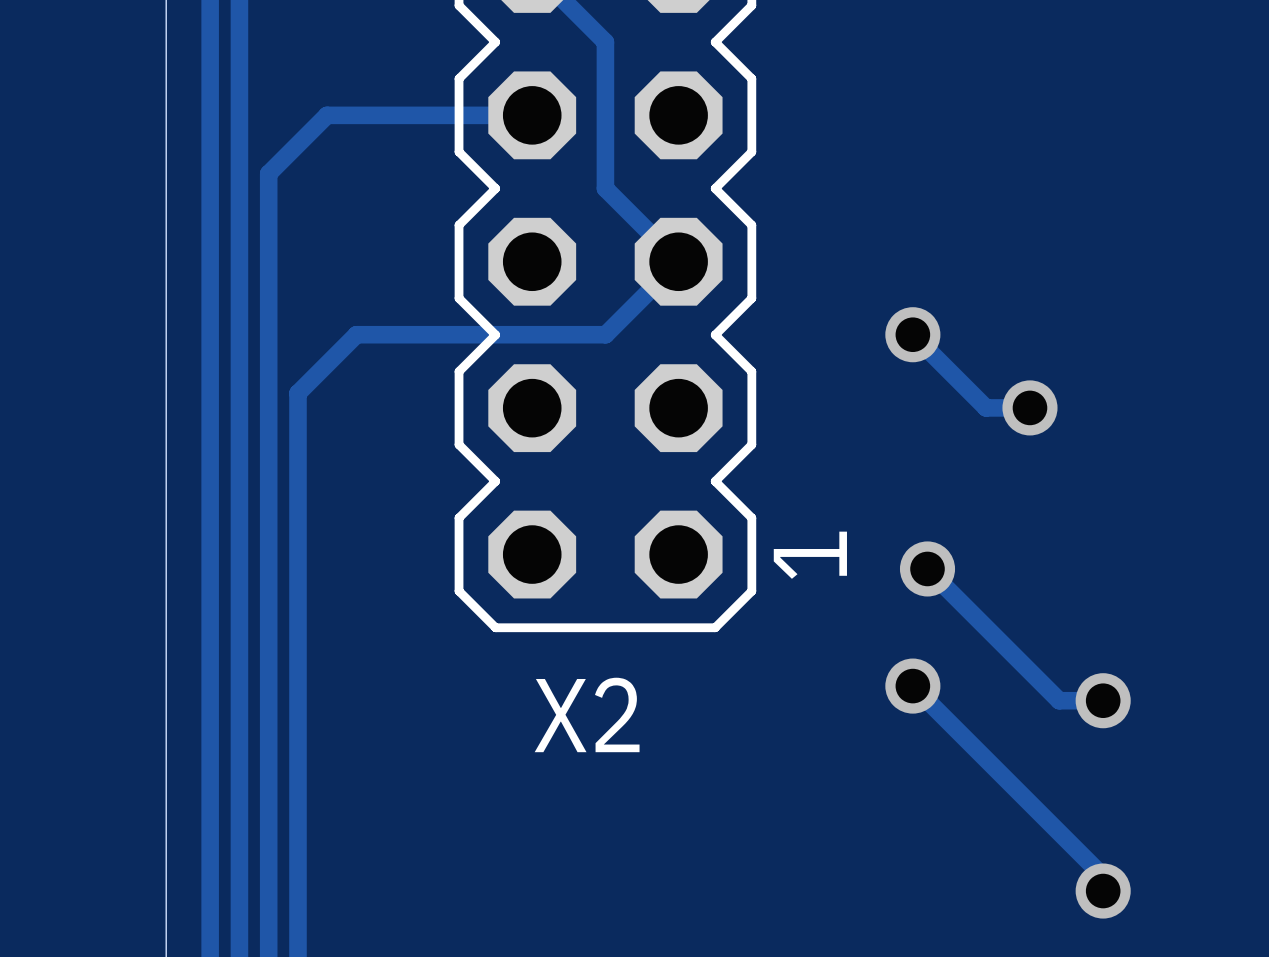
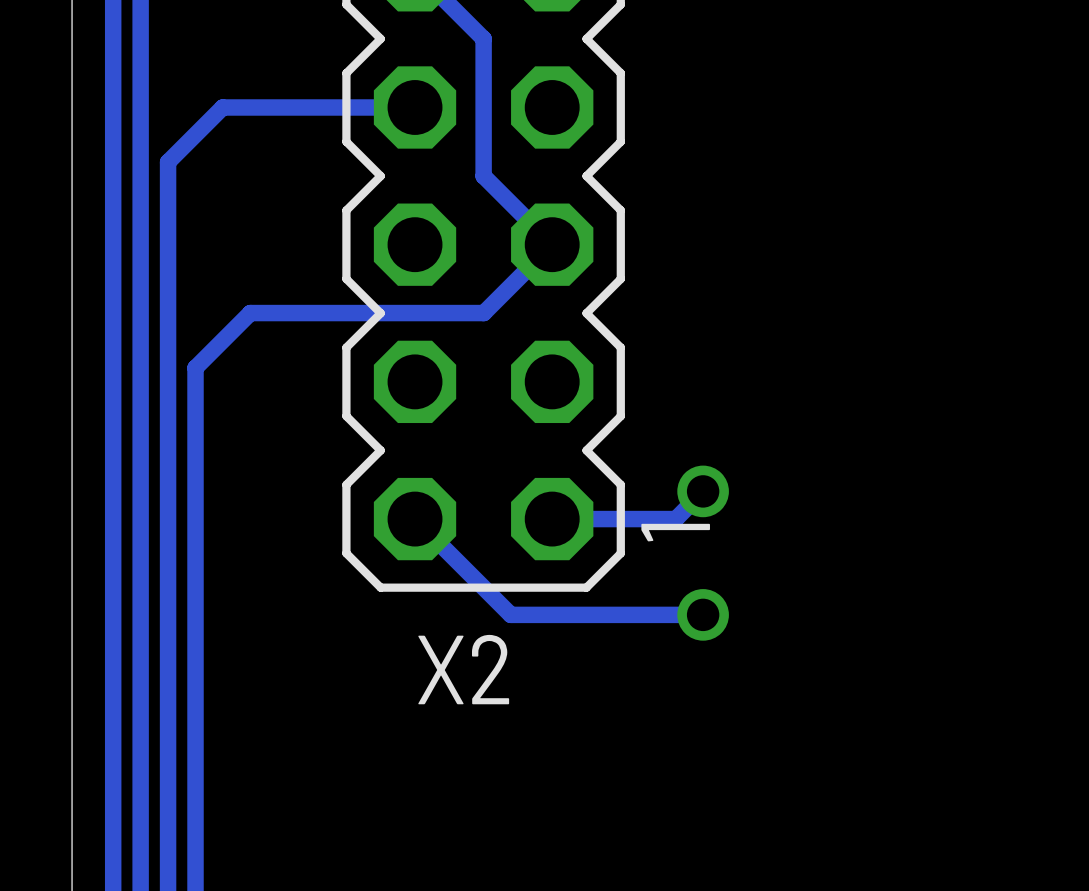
track: (912, 334) (986, 407) (1029, 407) -> none
via: (912, 334) -> none
via: (1029, 407) -> none
track: none -> (703, 491) (675, 519) (552, 519)
via: none -> (703, 491)
track: none -> (415, 519) (510, 614) (703, 614)
track: (927, 568) (1059, 700) (1103, 700) -> none
via: (927, 568) -> none
via: none -> (703, 614)
track: (912, 686) (1103, 876) (1103, 891) -> none
via: (912, 686) -> none
via: (1103, 700) -> none
via: (1103, 891) -> none

